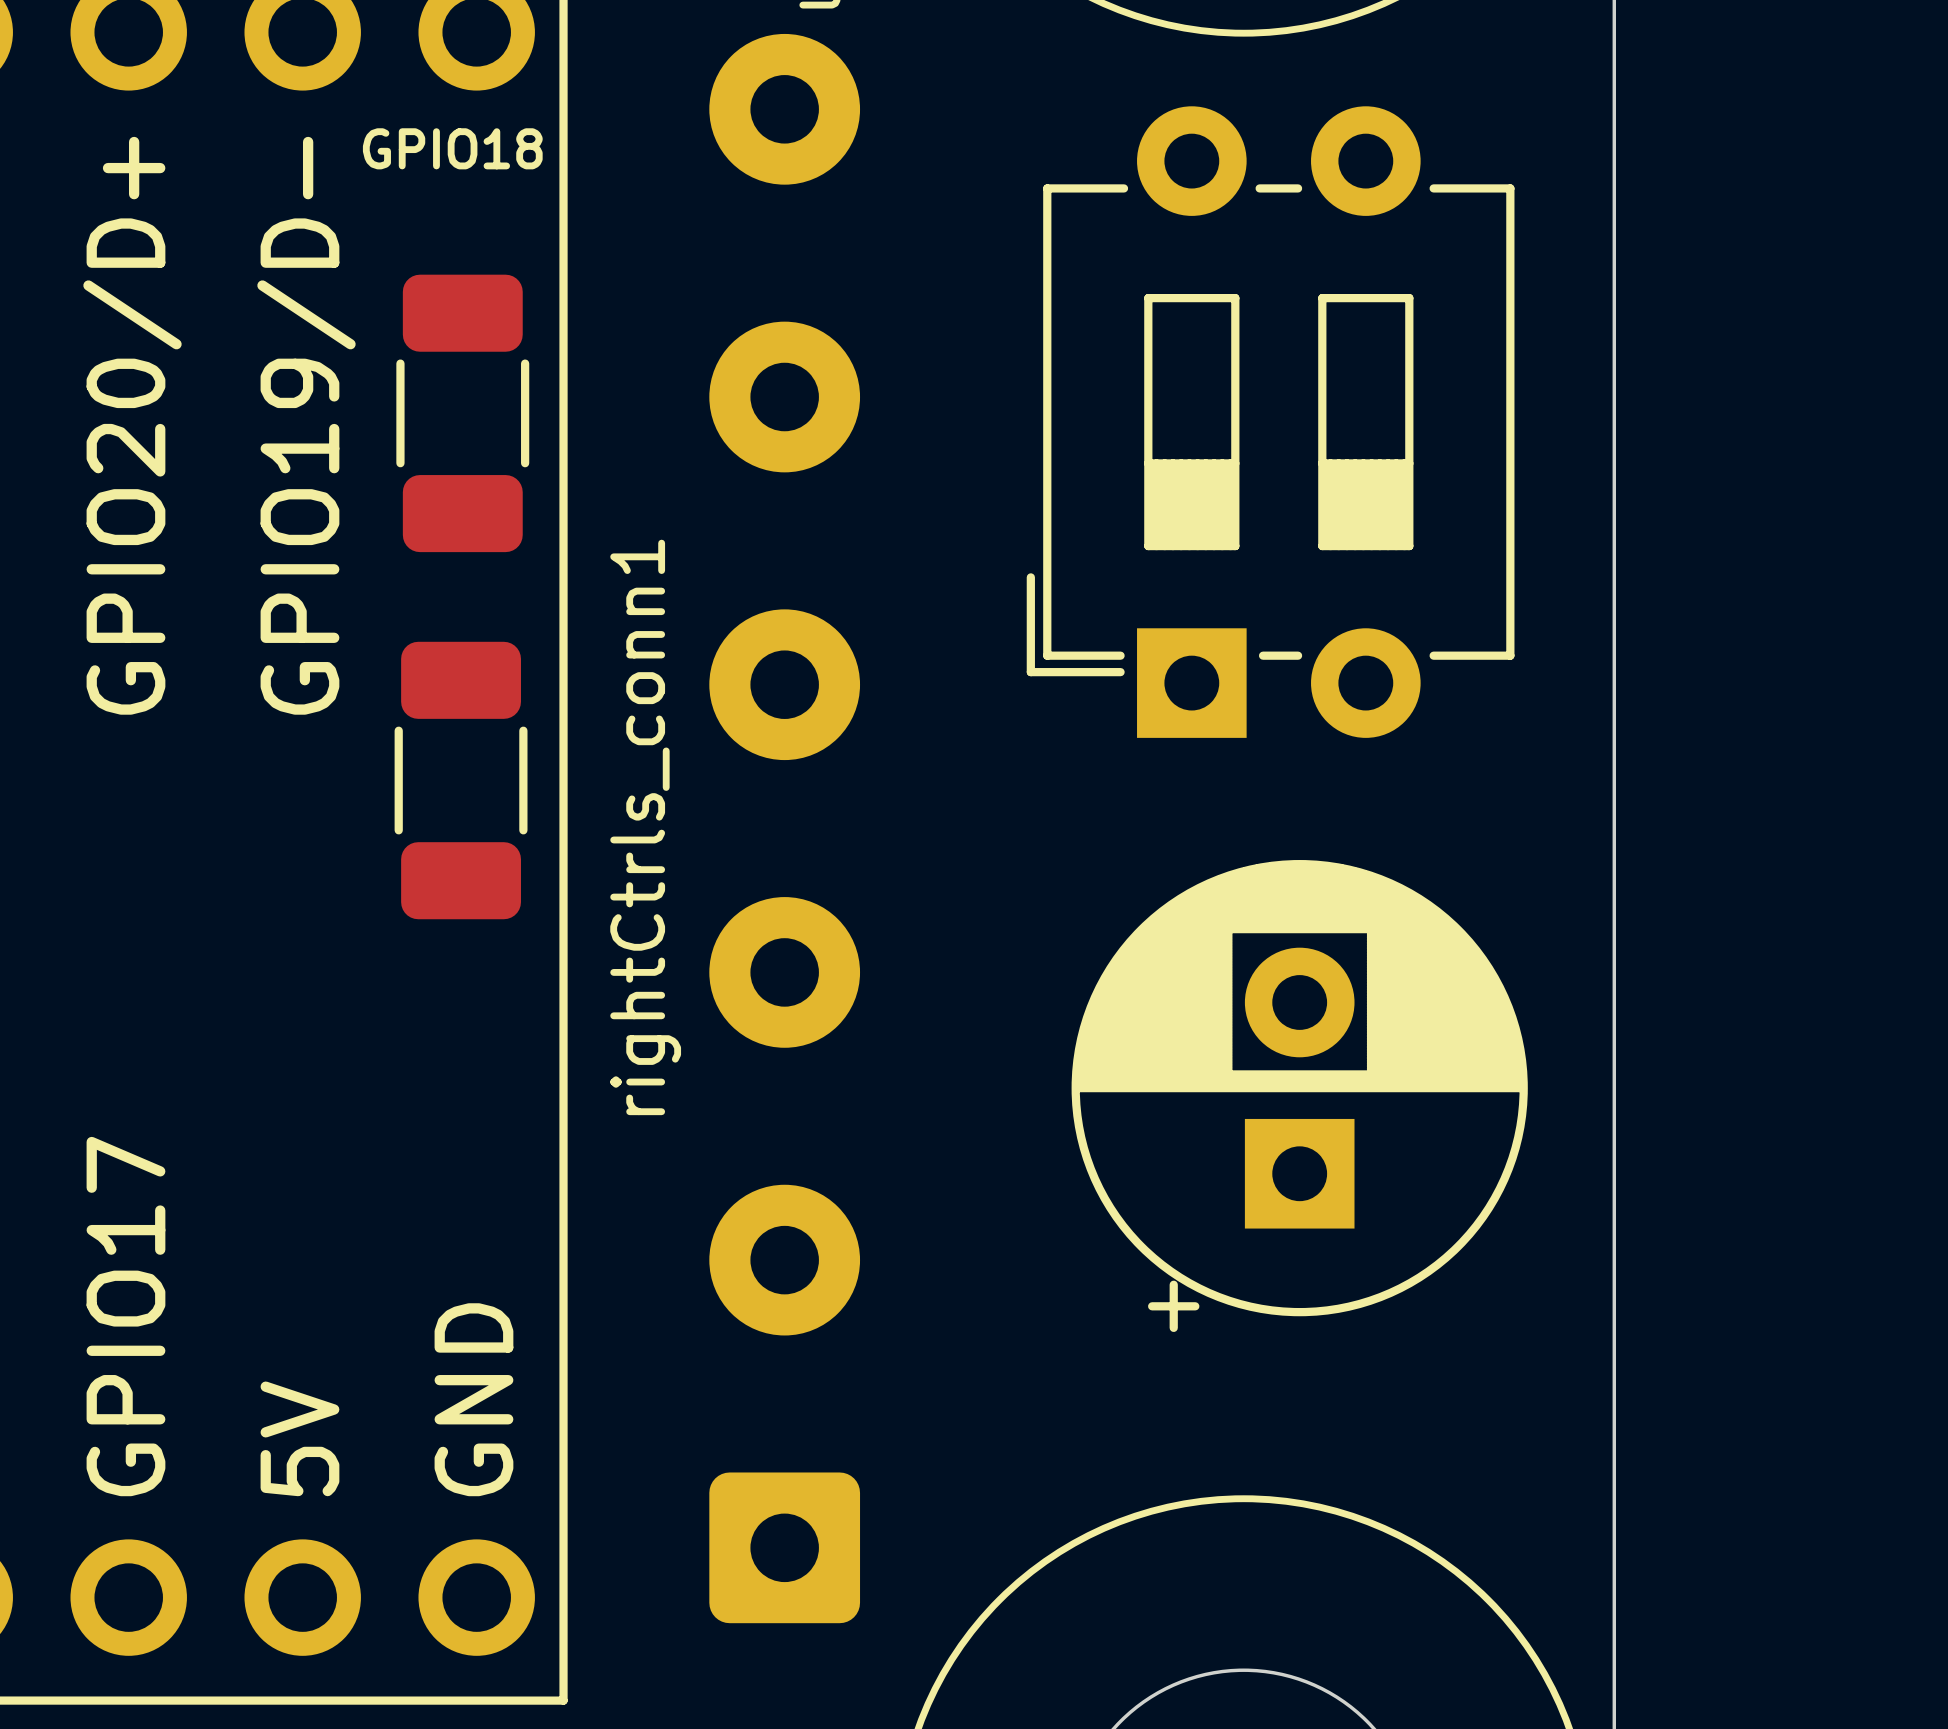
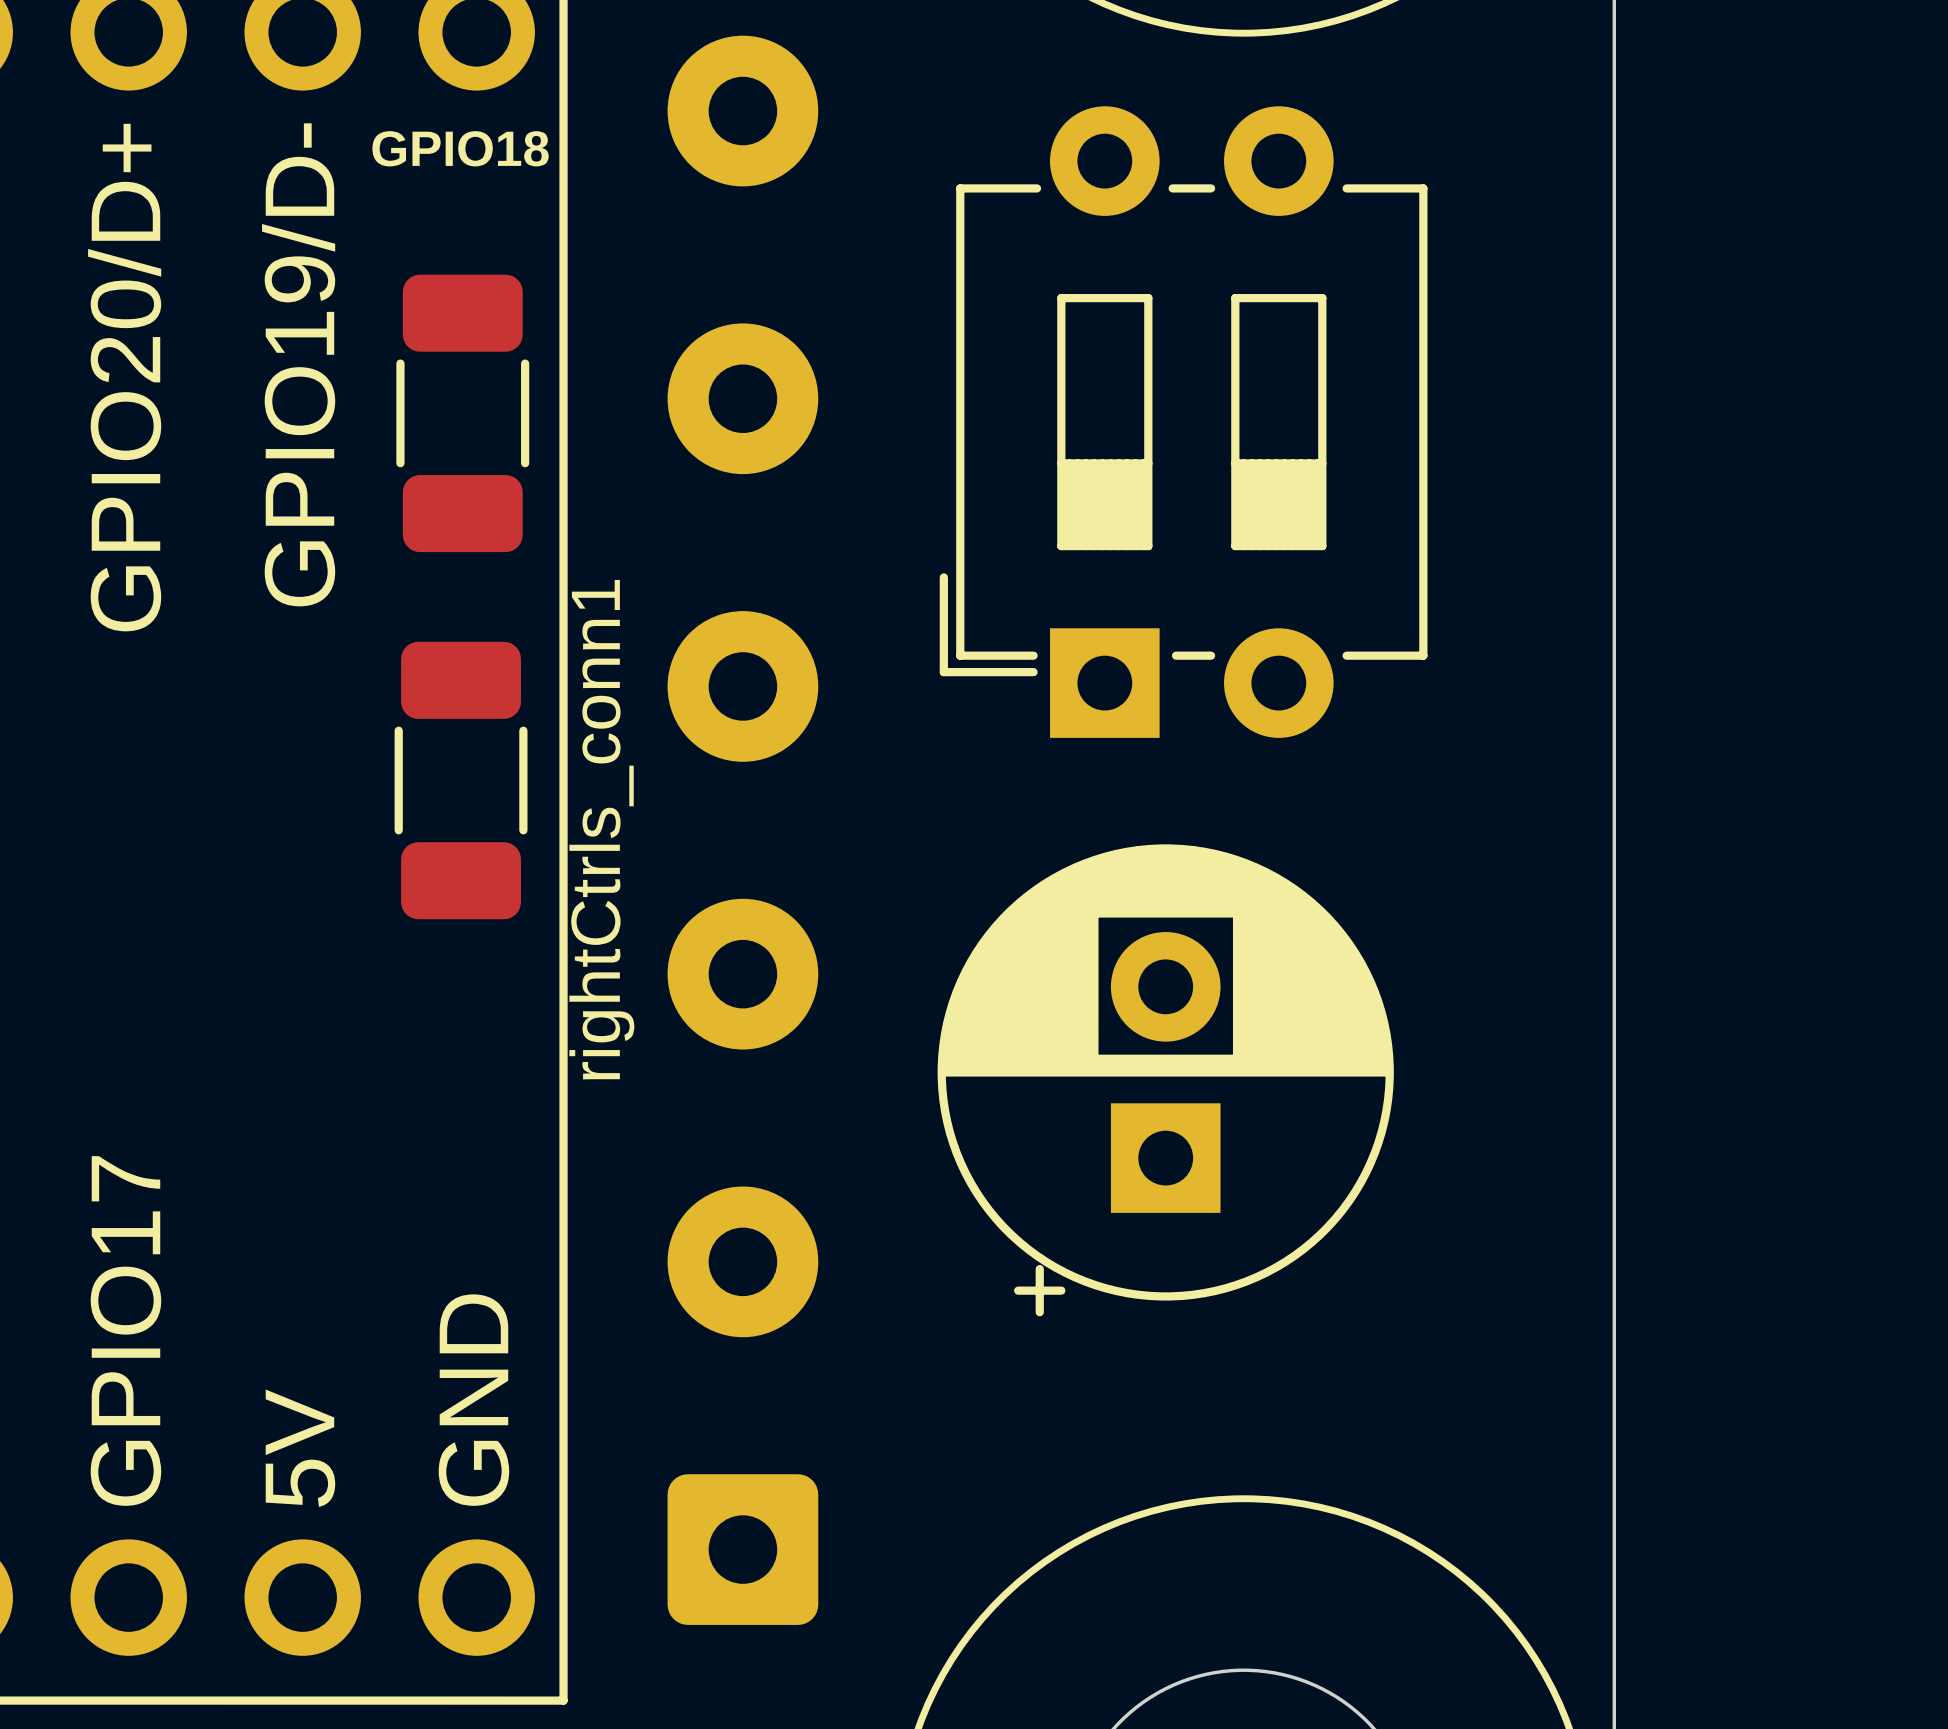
part position: (1270, 422) -> (1183, 422)
rightCtrls_conn1 position: (784, 828) -> (742, 830)
part position: (1299, 1096) -> (1165, 1080)

